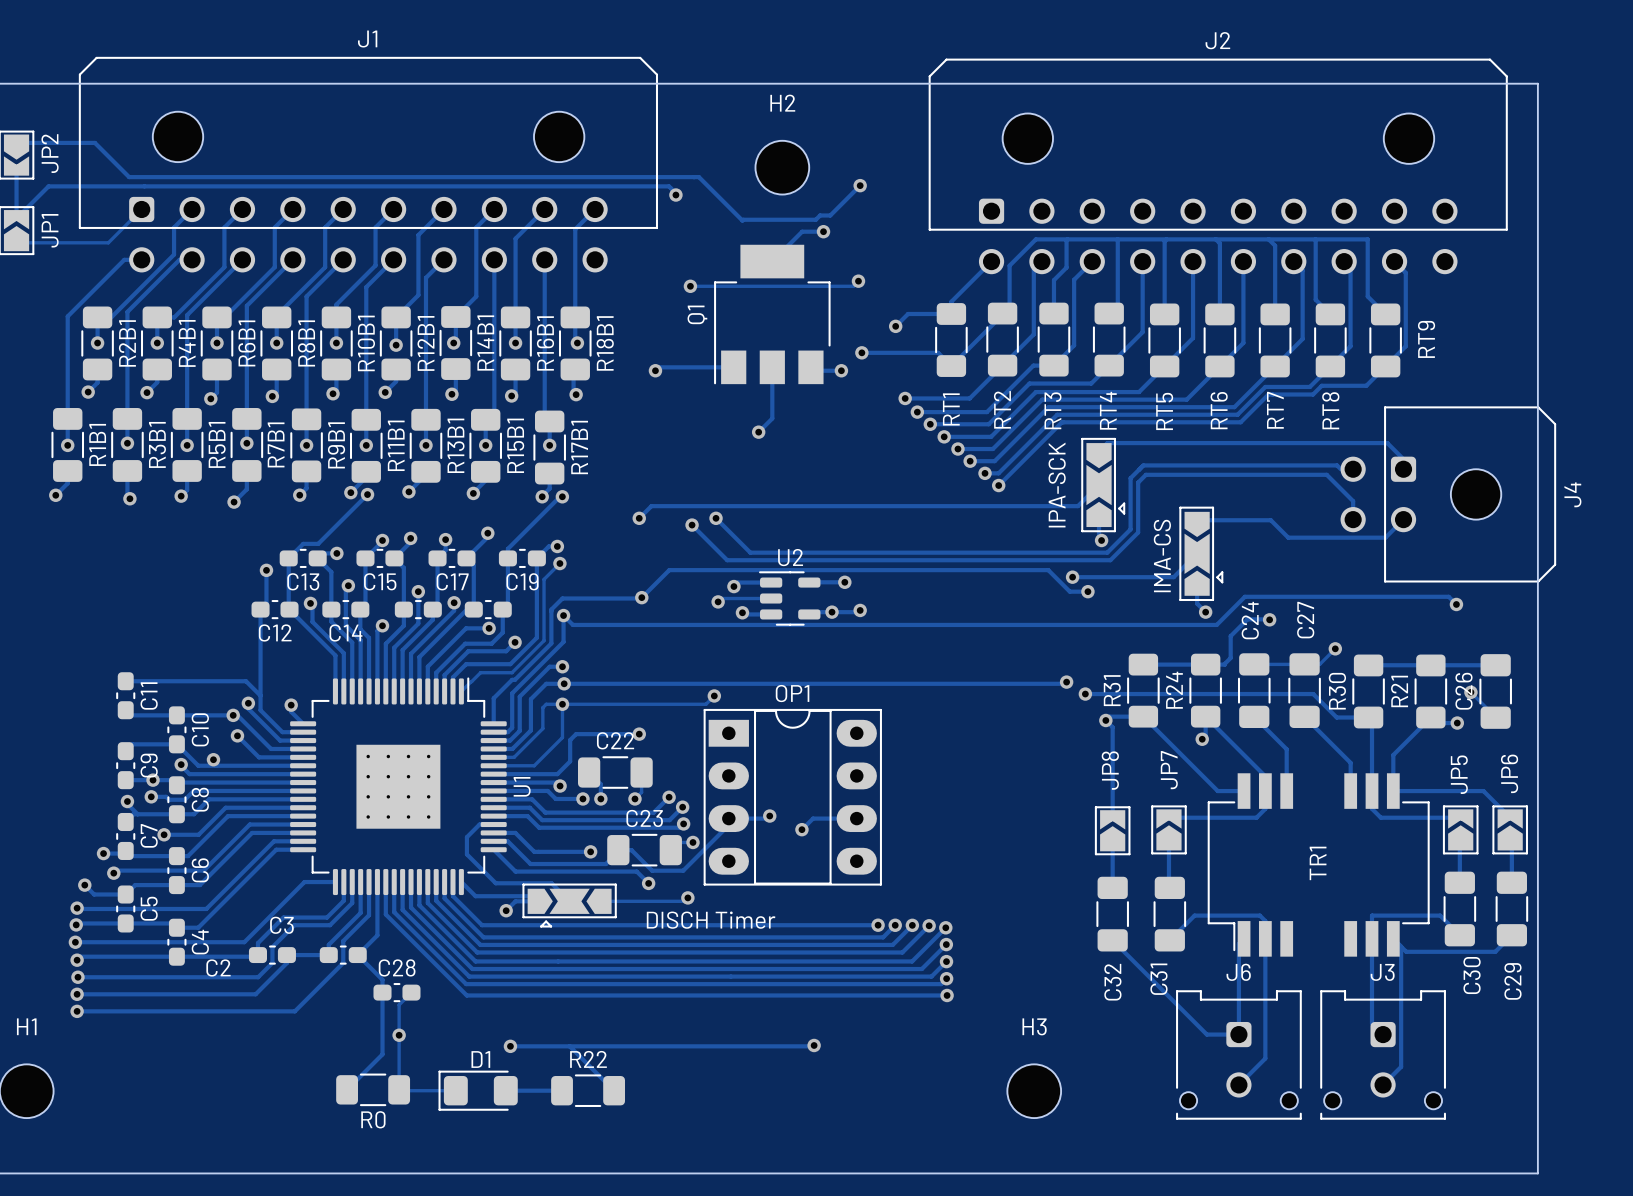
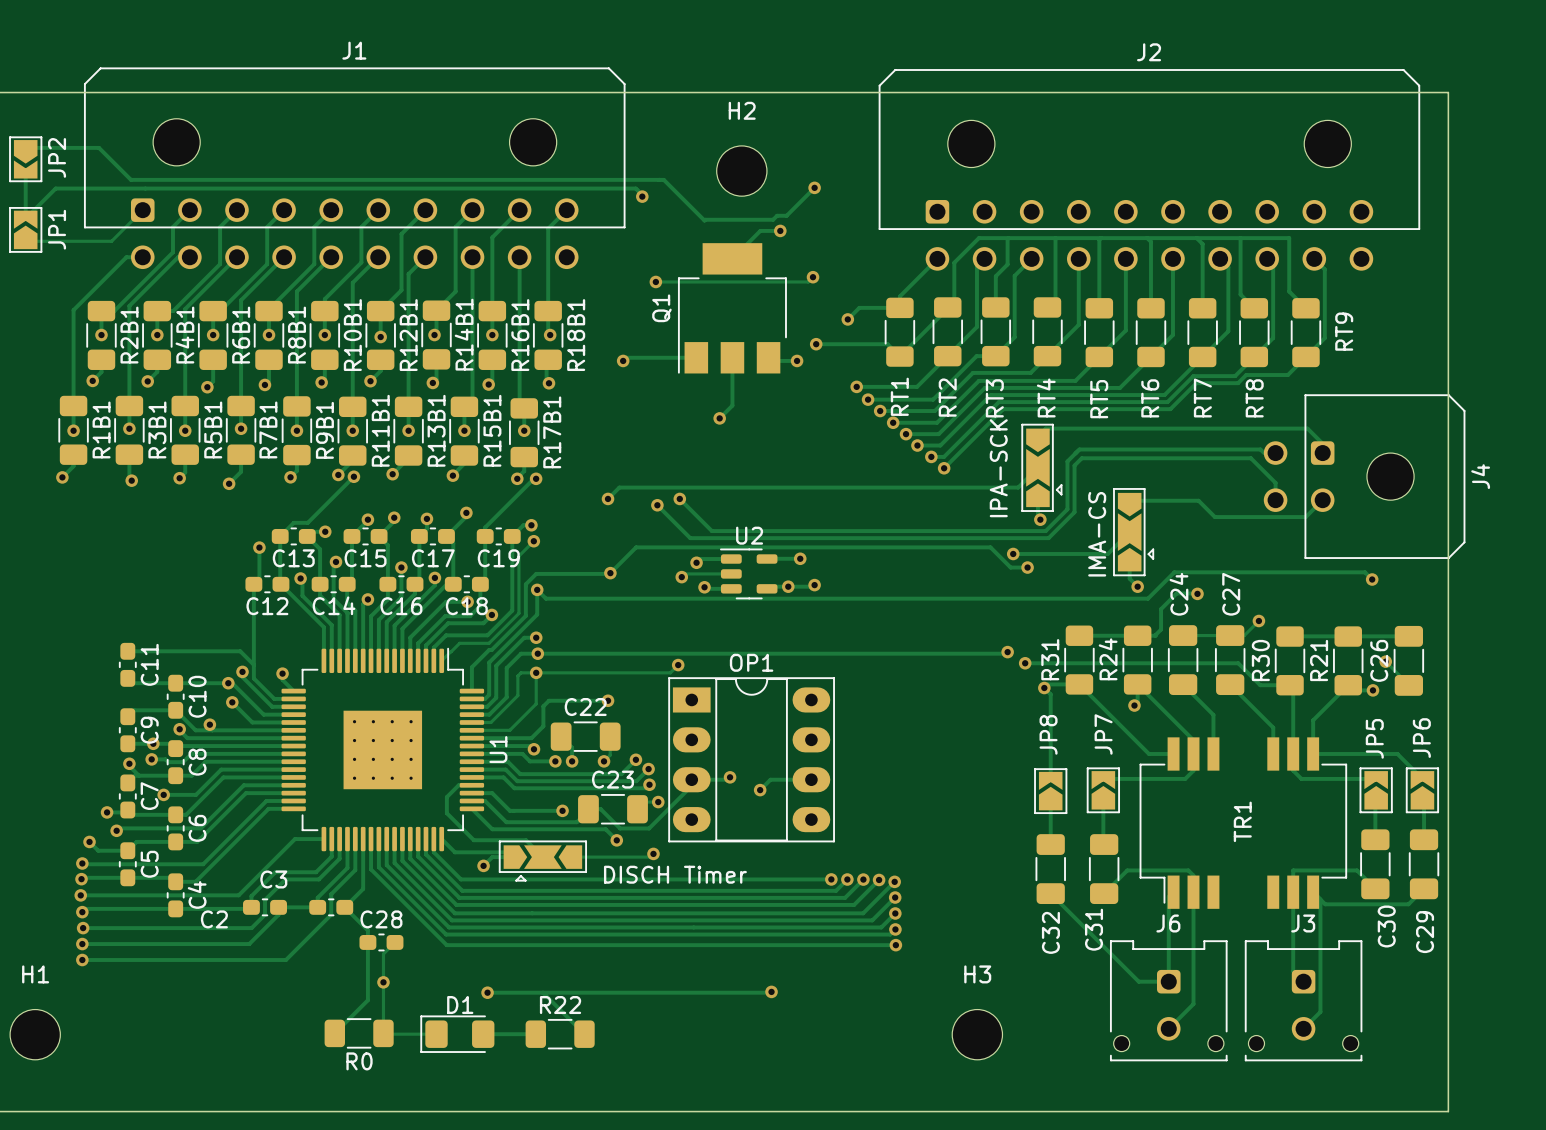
C16 name: none -> C16 (401, 606)
C18 name: none -> C18 (466, 606)

